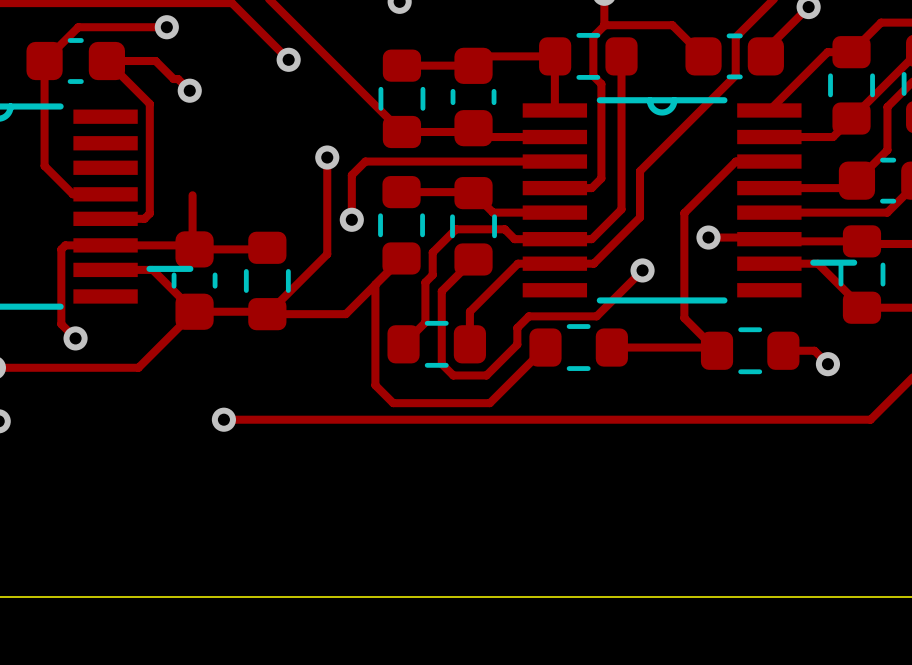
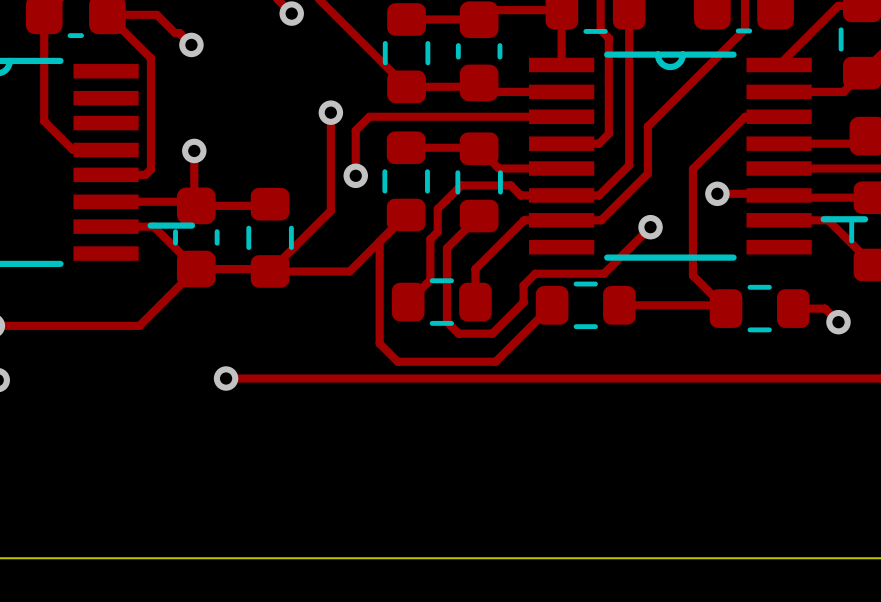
track: (105, 245) (65, 245) (61, 249) (61, 324) (75, 338) -> none
via position: (75, 338) -> (194, 150)

